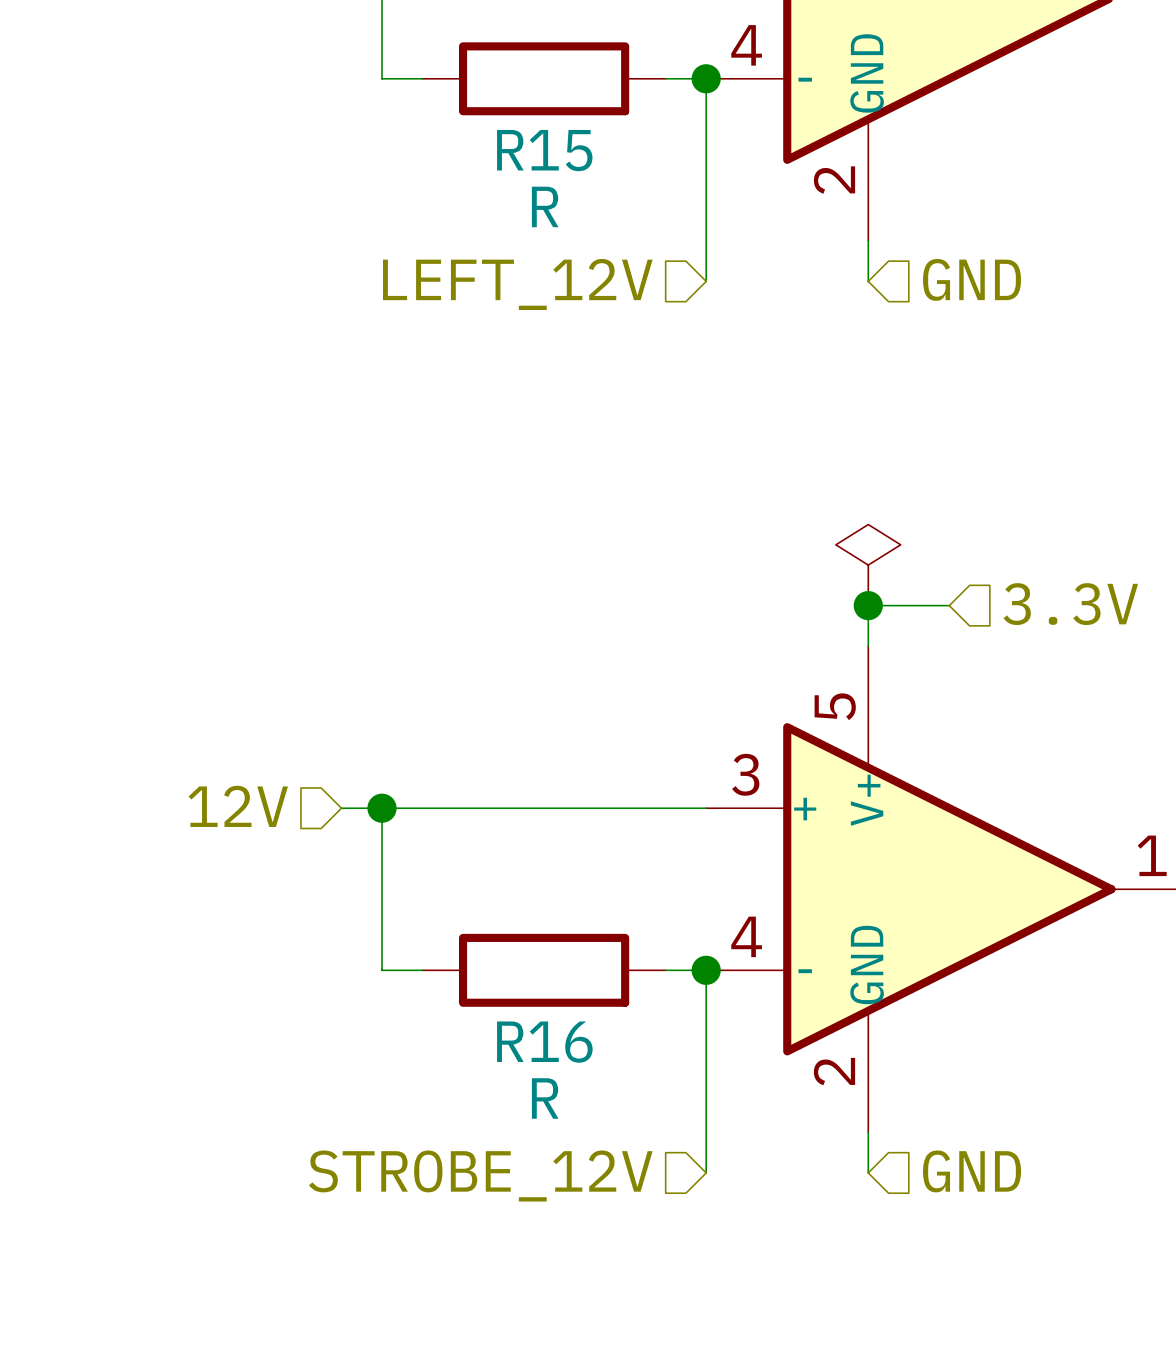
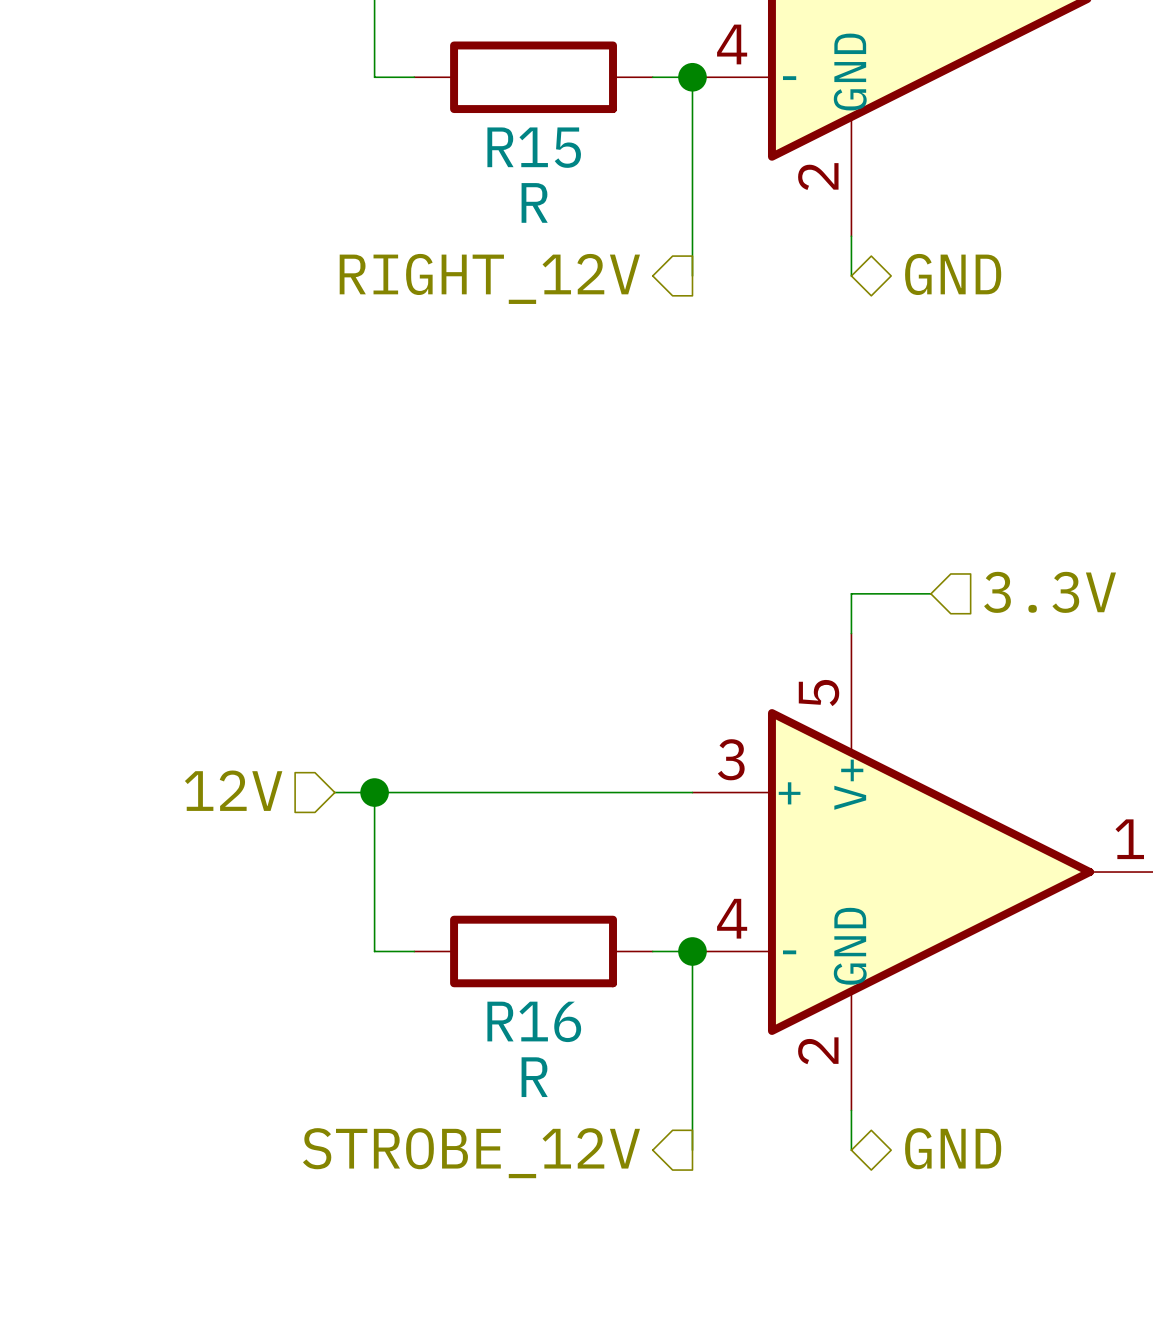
hierarchical label shape: input (972, 279) -> bidirectional (953, 274)
hierarchical label shape: input (517, 284) -> output (489, 278)
hierarchical label: LEFT_12V (517, 284) -> RIGHT_12V (489, 278)
power symbol: (868, 565) -> none
junction: (868, 605) -> none
hierarchical label shape: input (972, 1171) -> bidirectional (953, 1148)
hierarchical label shape: input (480, 1175) -> output (471, 1153)

